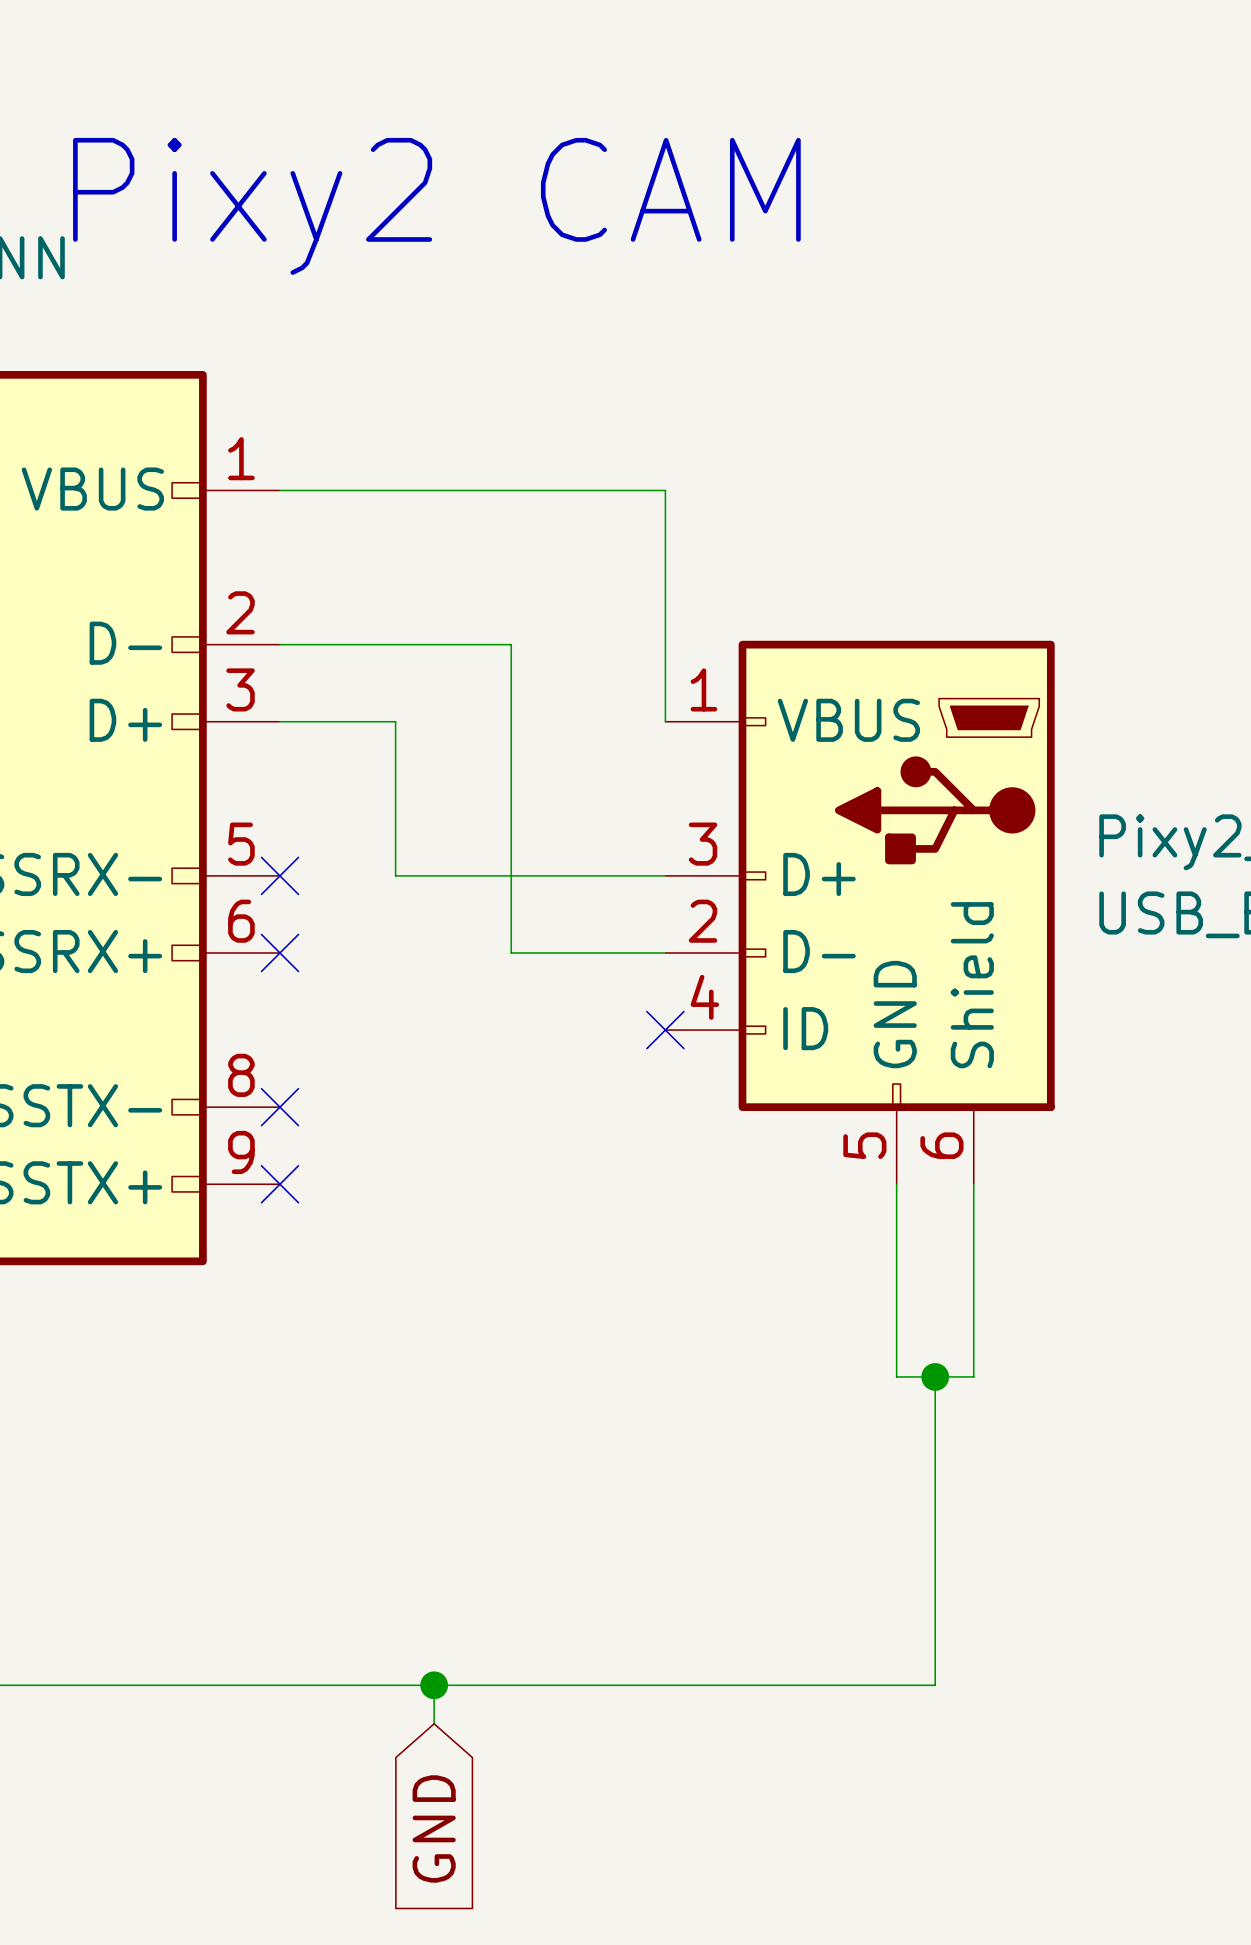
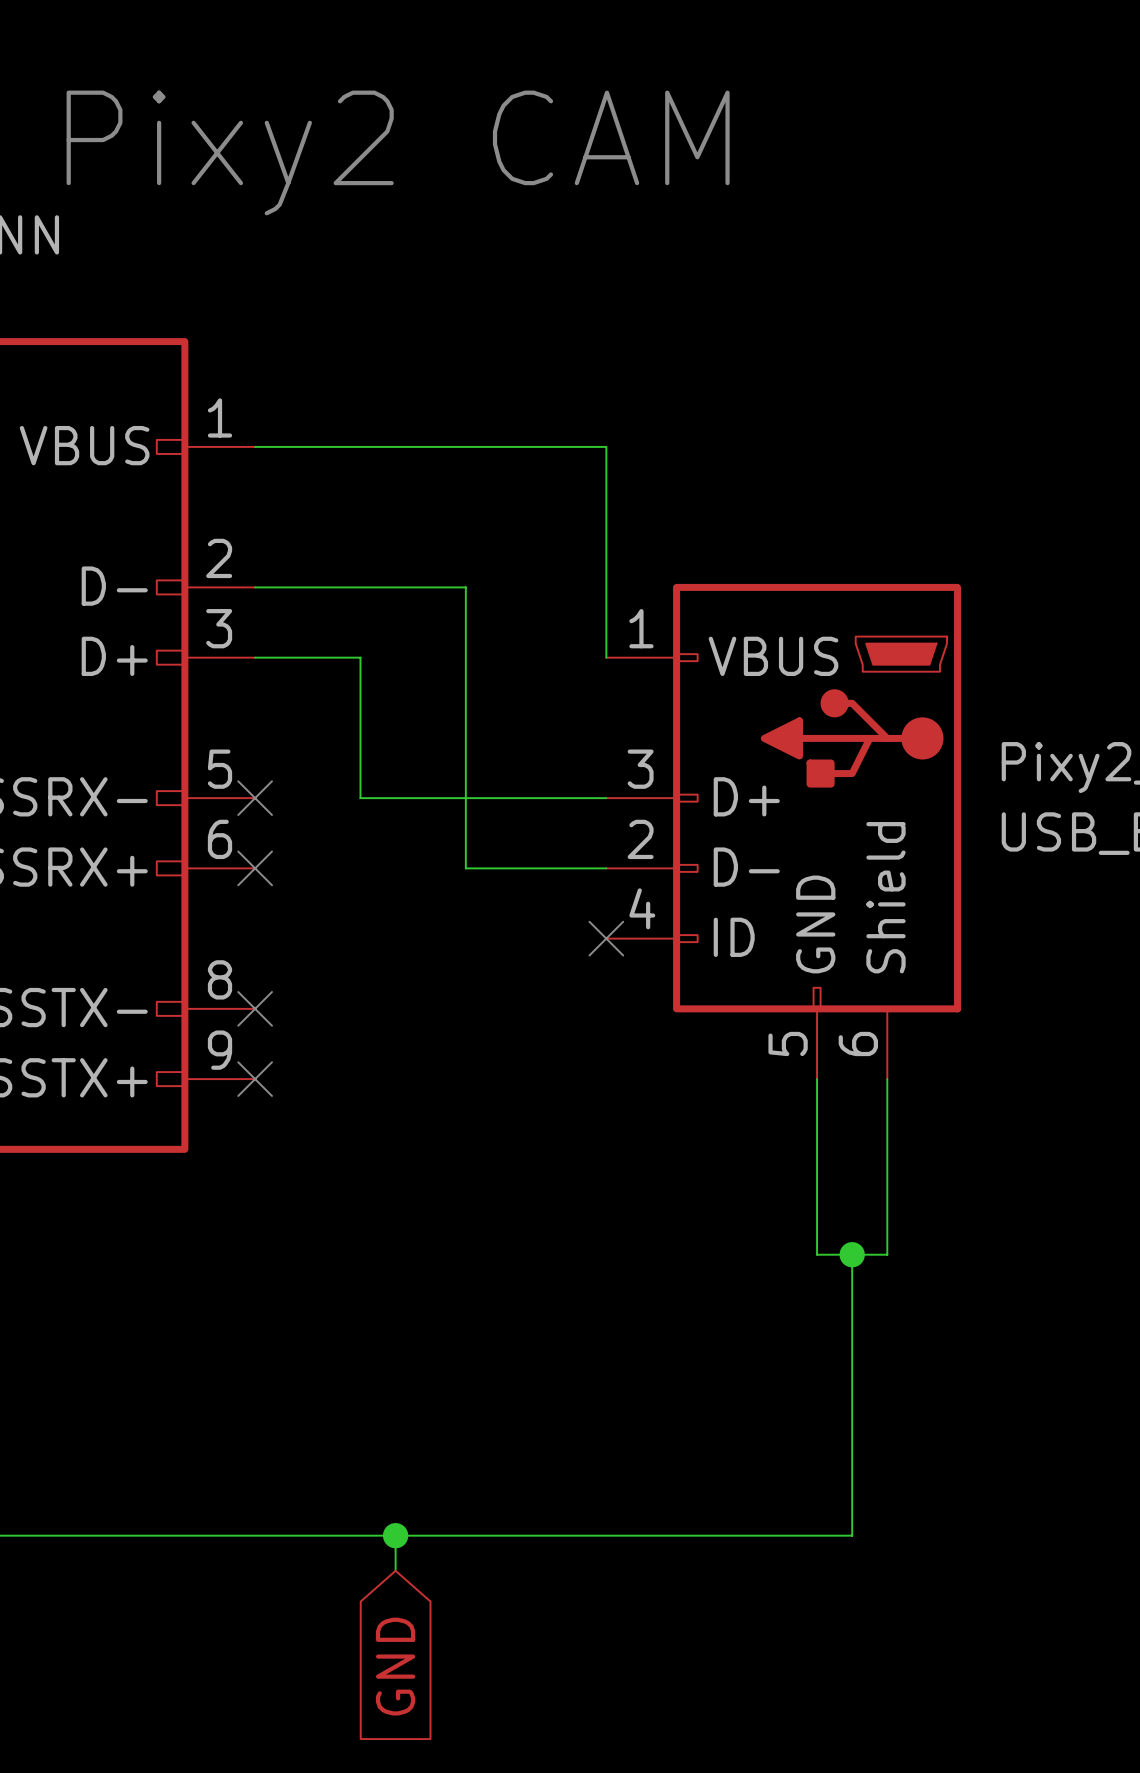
text position: Pixy2 CAM (436, 206) -> Pixy2 CAM (398, 152)

